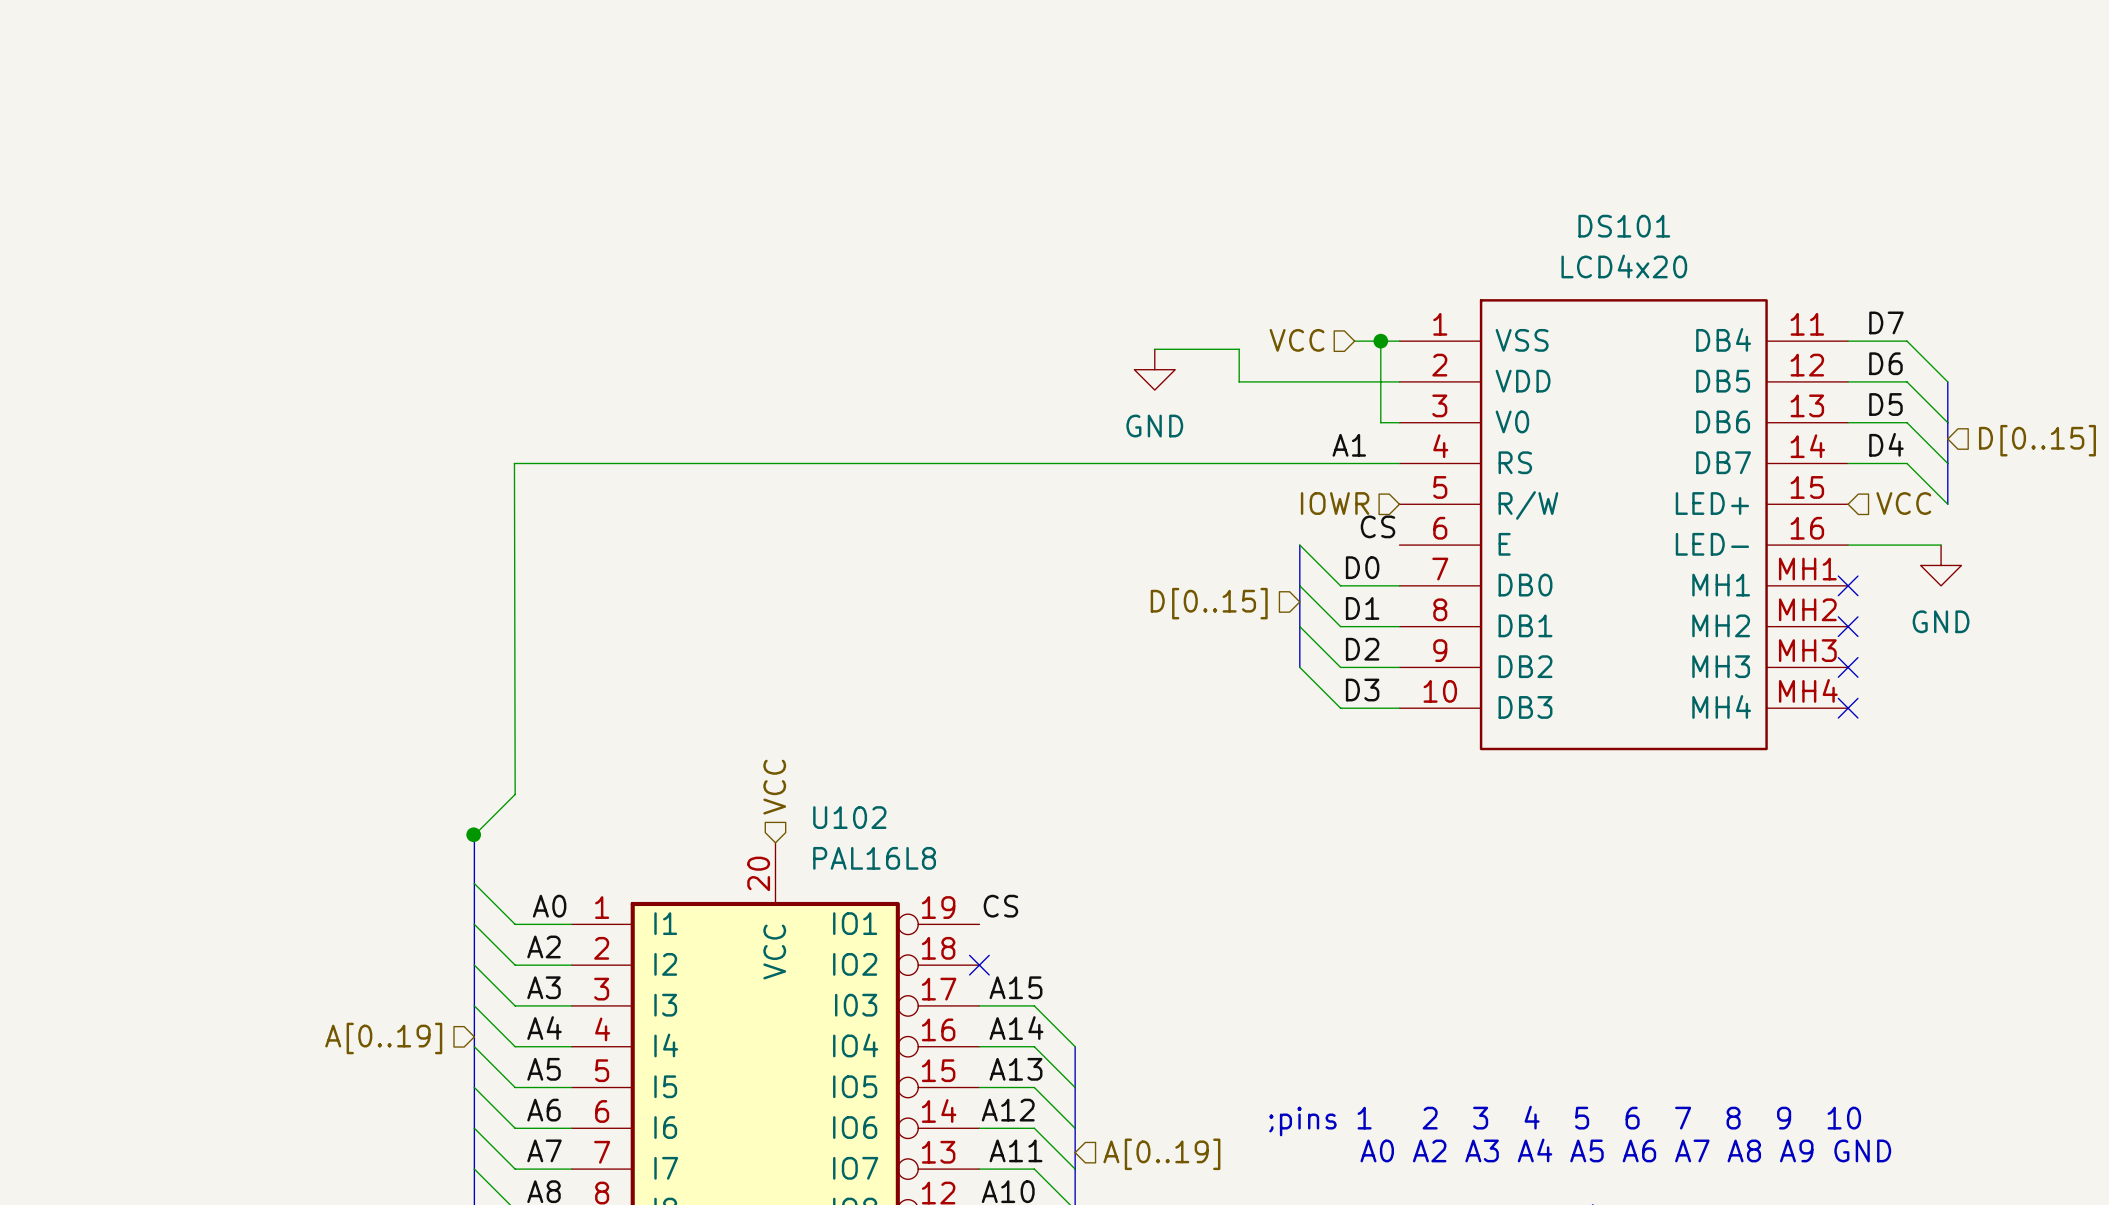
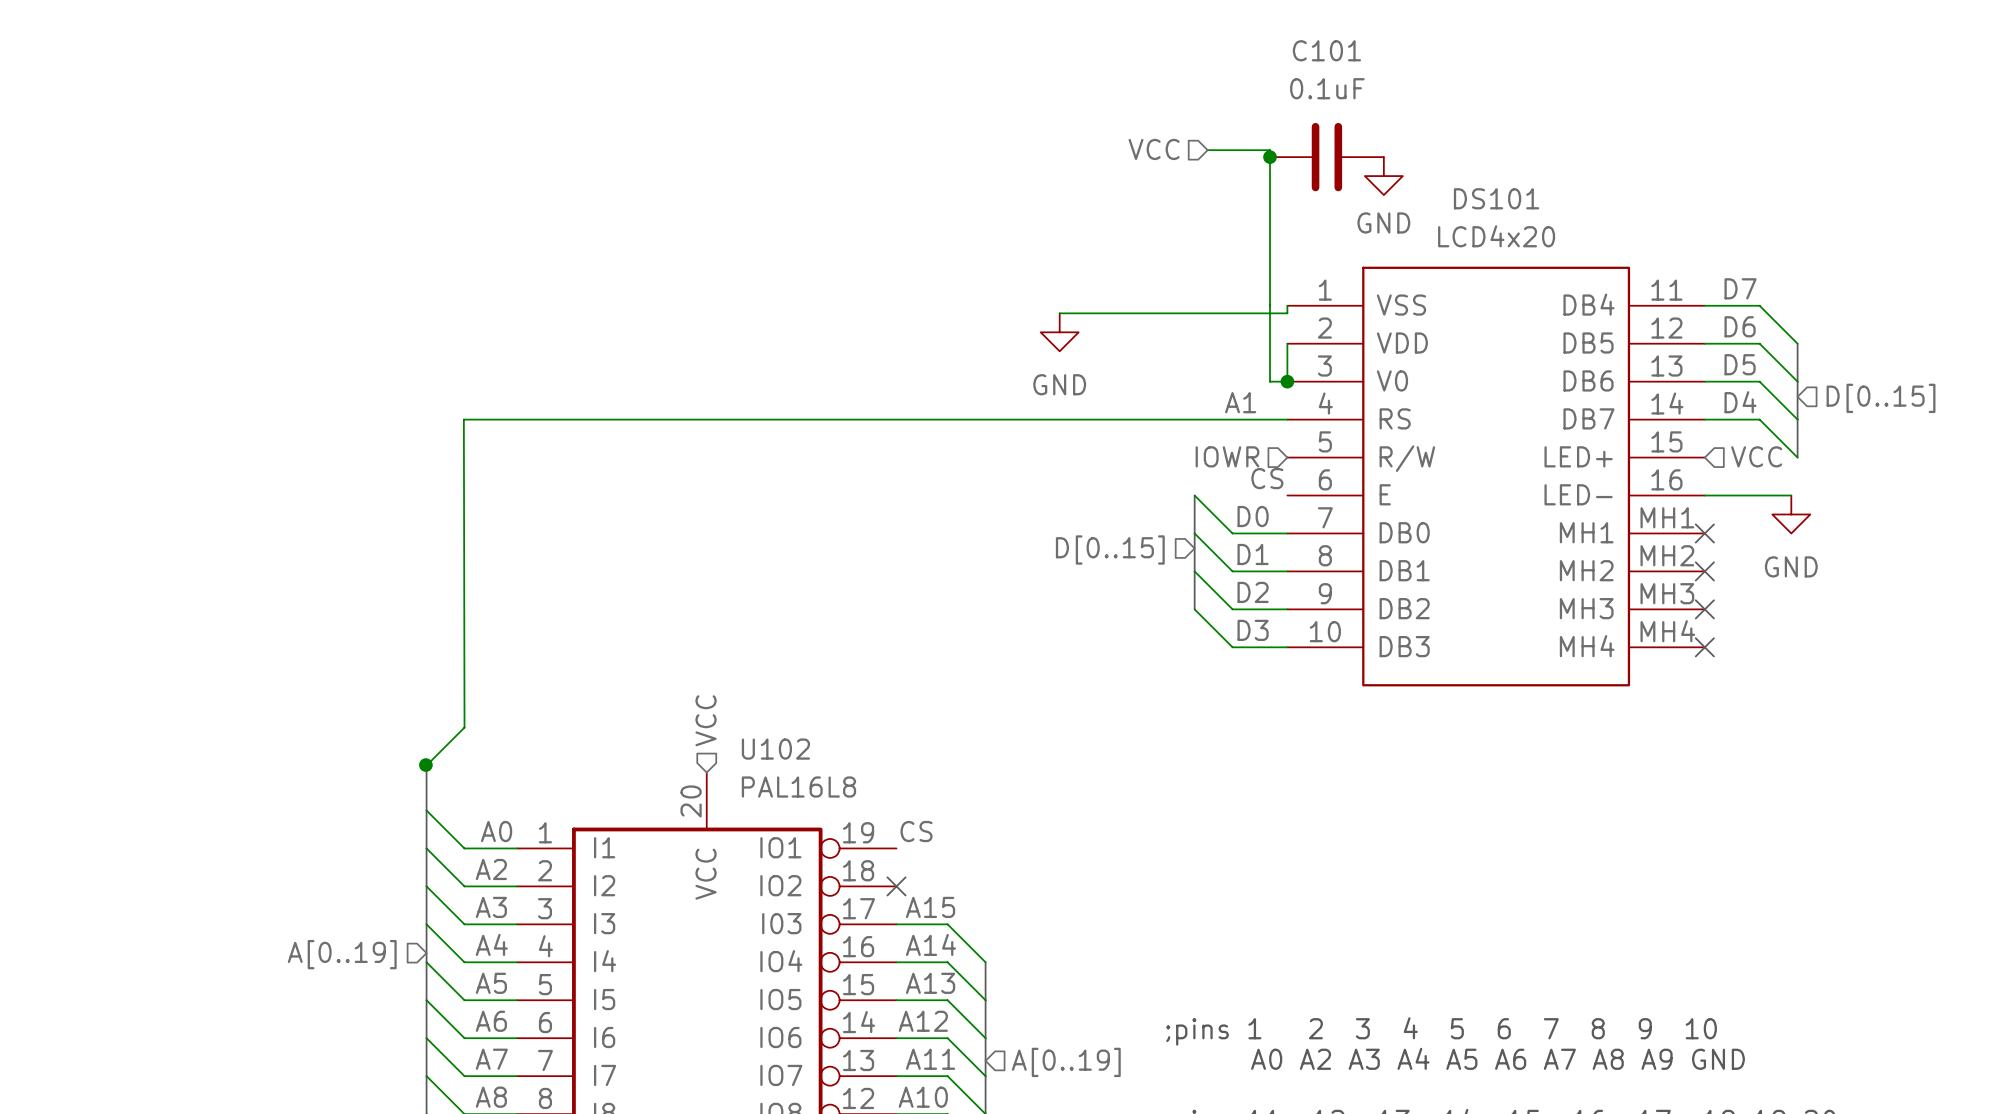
wire: none -> (1207, 150) (1270, 150) (1270, 305)
junction: none -> (1270, 157)
C101: none -> 0.1uF (1326, 157)
power symbol: none -> GND (1383, 176)
hierarchical label position: VCC (1297, 340) -> VCC (1154, 149)
wire: (1354, 341) (1399, 341) -> none
junction: (1380, 341) -> none
wire: (1239, 349) (1239, 381) (1399, 381) -> (1138, 313) (1287, 313) (1287, 305)
wire: none -> (1287, 343) (1287, 381)
junction: none -> (1287, 381)

